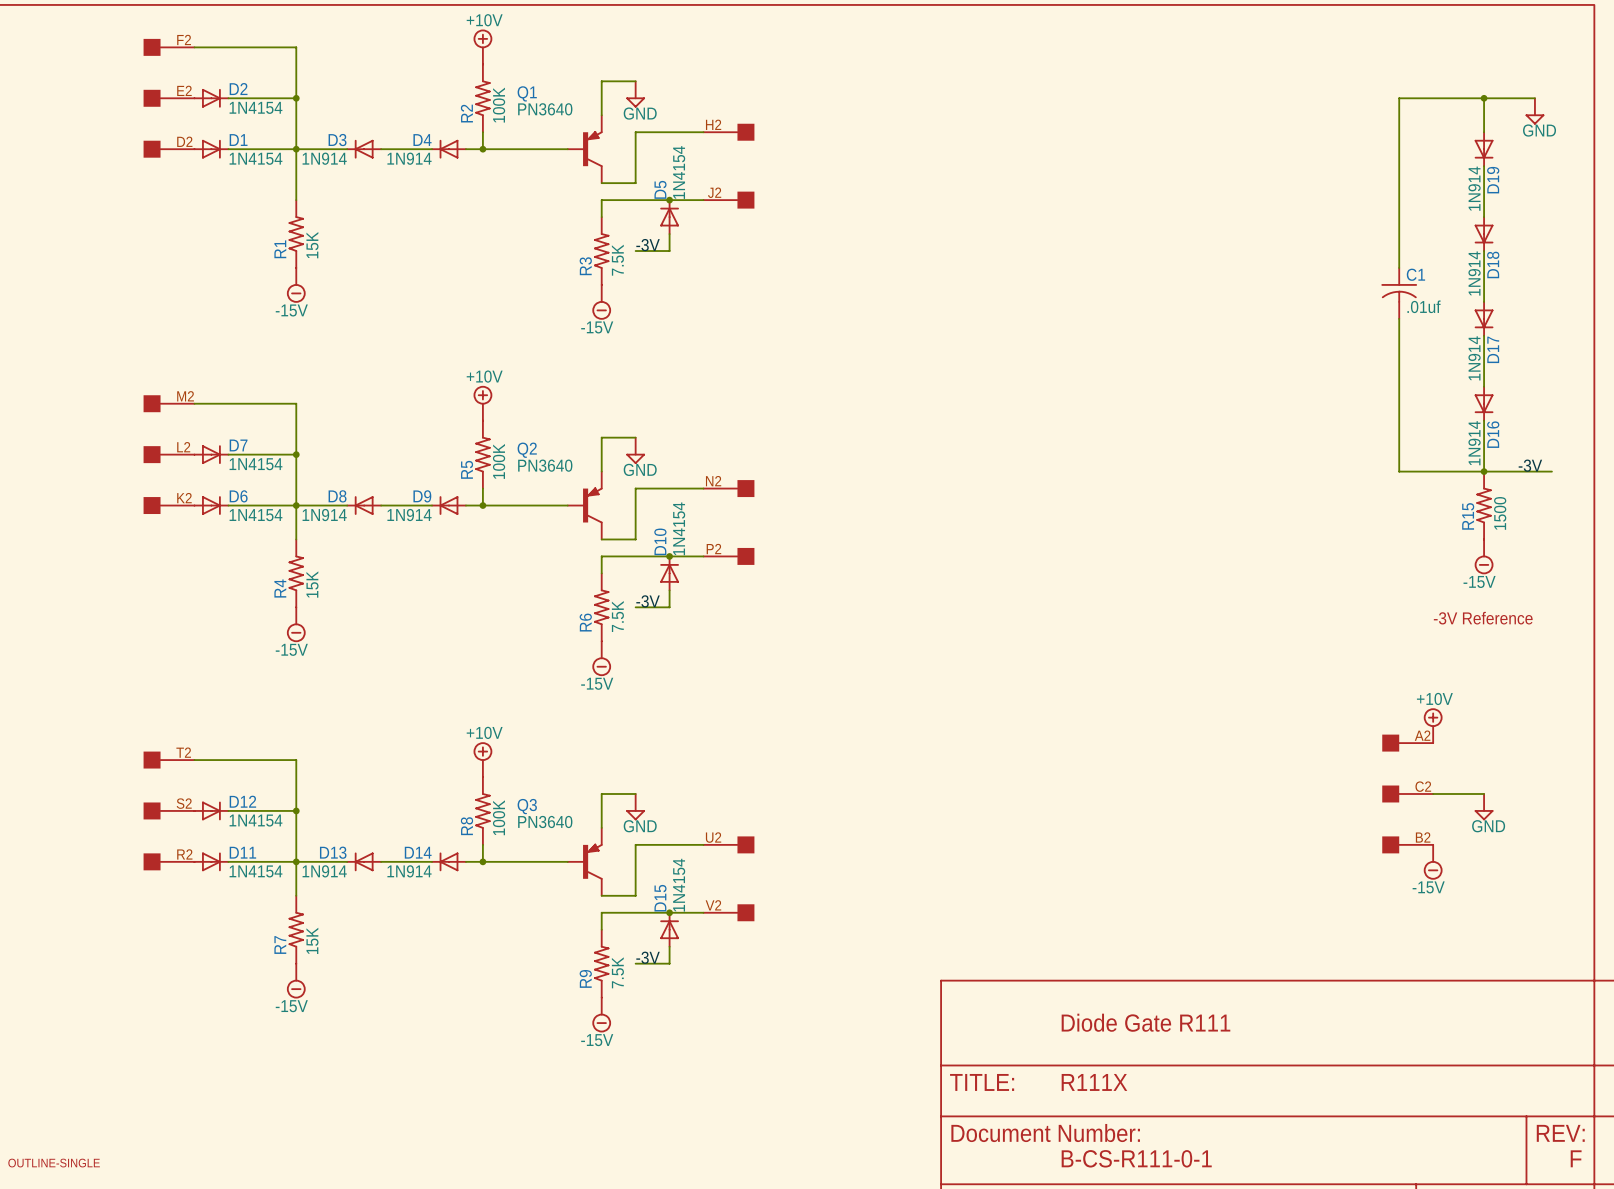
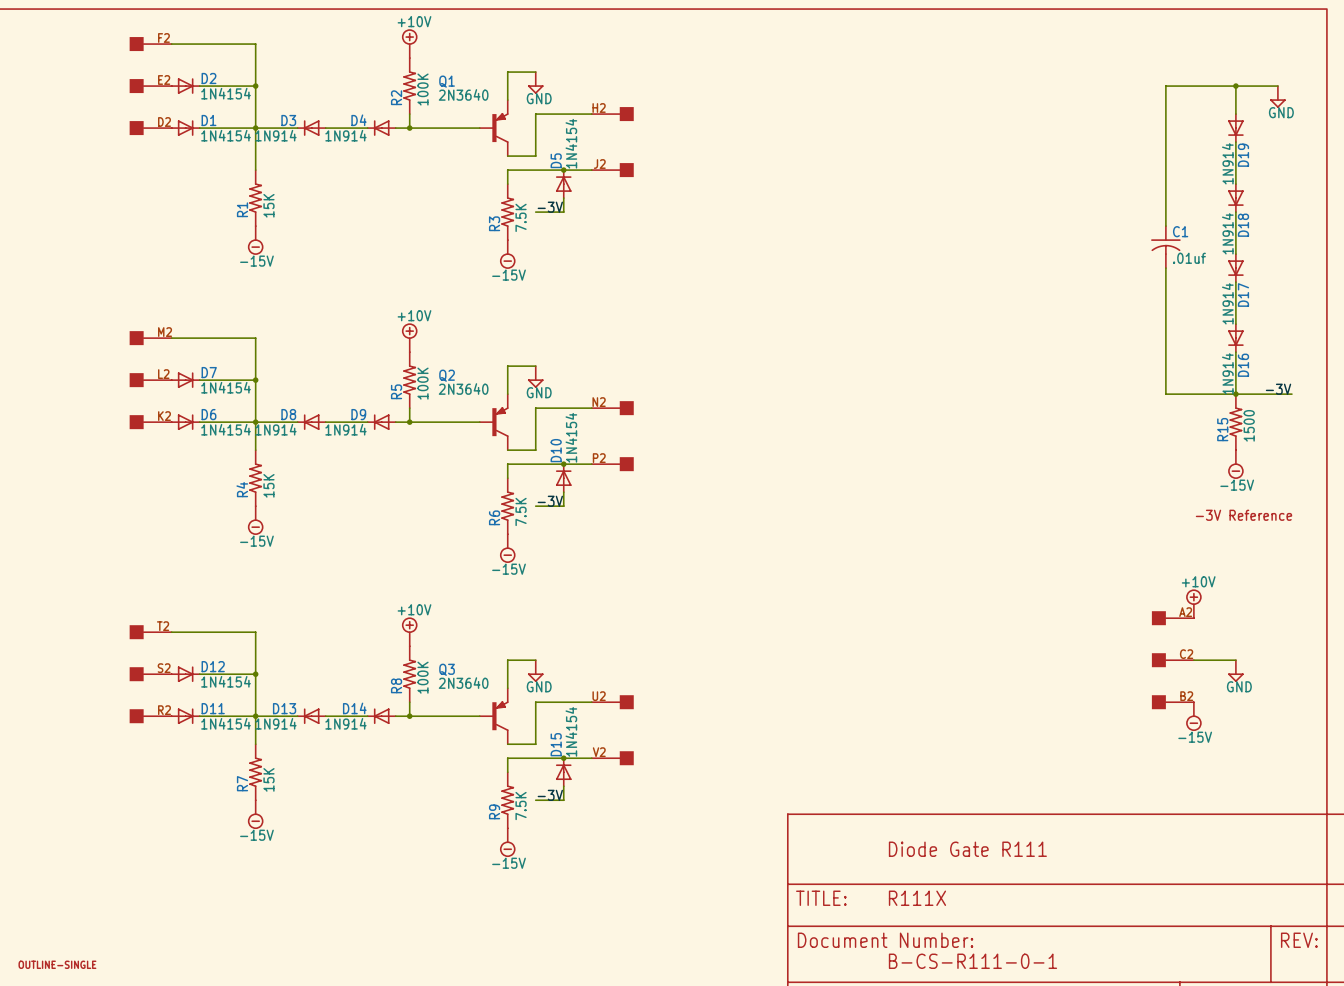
Q1 value: PN3640 (545, 109) -> 2N3640 (463, 94)
Q2 value: PN3640 (545, 465) -> 2N3640 (463, 389)
Q3 value: PN3640 (545, 821) -> 2N3640 (463, 683)
text: F (1576, 1158) -> none

